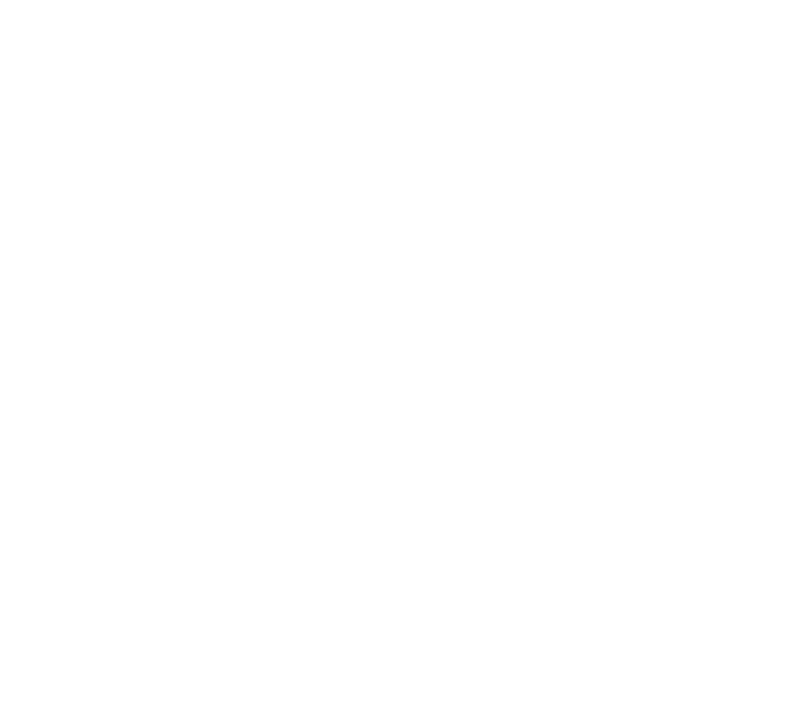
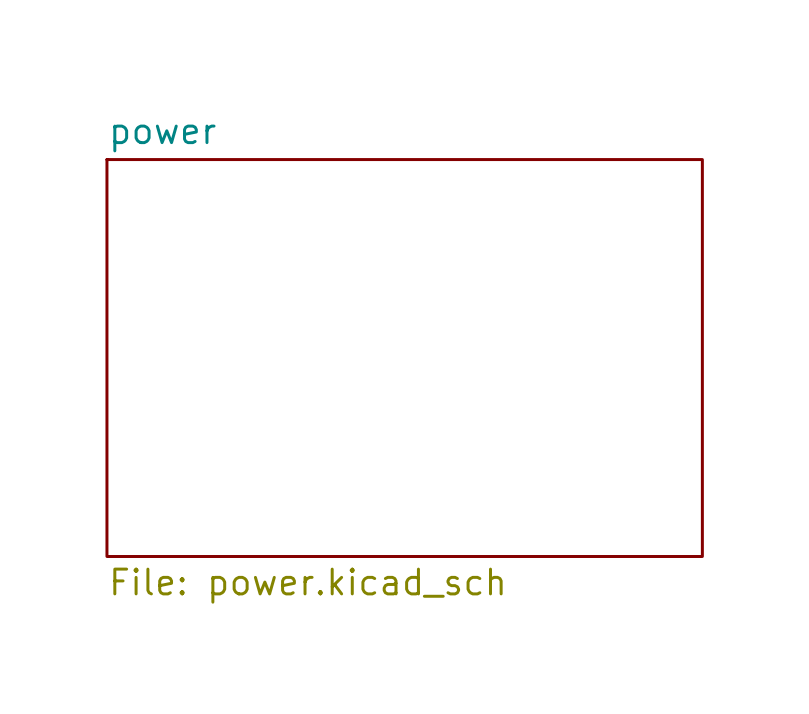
sheet power: none -> File: power.kicad_sch (404, 358)

